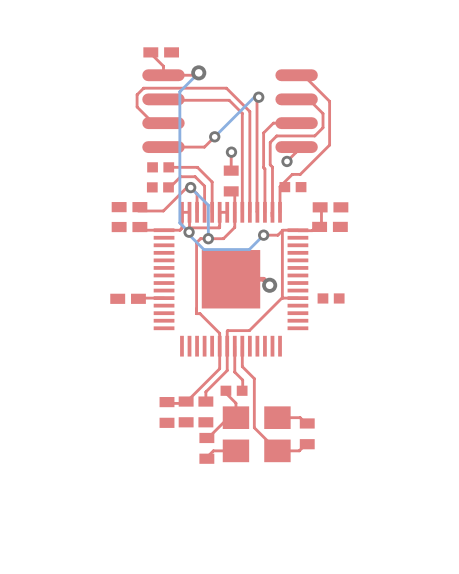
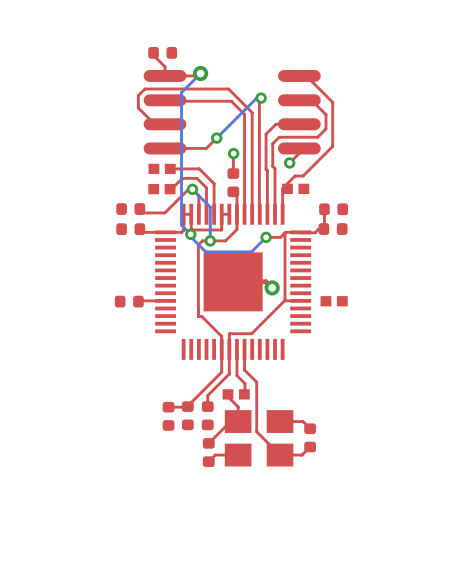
part footprint: [143, 47, 180, 58] -> [148, 46, 178, 59]
part footprint: [223, 165, 239, 197] -> [227, 168, 240, 198]
part footprint: [111, 202, 148, 213] -> [116, 203, 146, 215]
part footprint: [312, 202, 349, 213] -> [319, 203, 349, 216]
part footprint: [111, 221, 148, 233] -> [116, 223, 146, 236]
part footprint: [312, 221, 348, 233] -> [318, 223, 348, 235]
part footprint: [110, 293, 146, 304] -> [114, 295, 144, 308]
part footprint: [159, 396, 175, 428] -> [162, 401, 175, 431]
part footprint: [178, 396, 194, 428] -> [181, 401, 194, 431]
part footprint: [198, 396, 214, 428] -> [201, 401, 214, 431]
part footprint: [299, 418, 315, 450] -> [304, 423, 317, 453]
part footprint: [199, 432, 215, 464] -> [202, 438, 215, 467]

